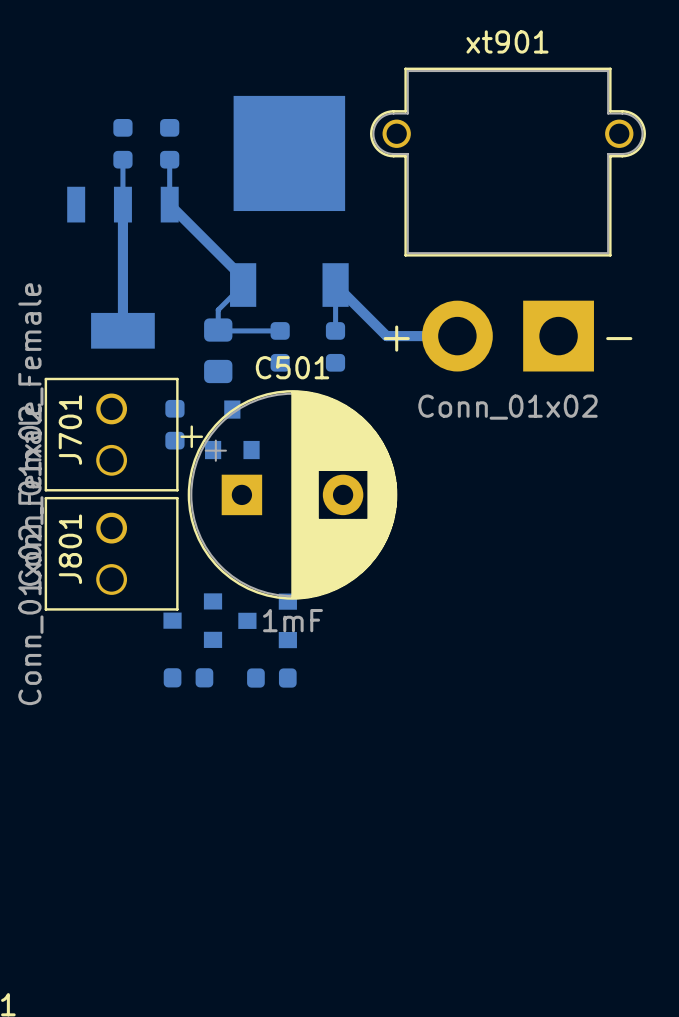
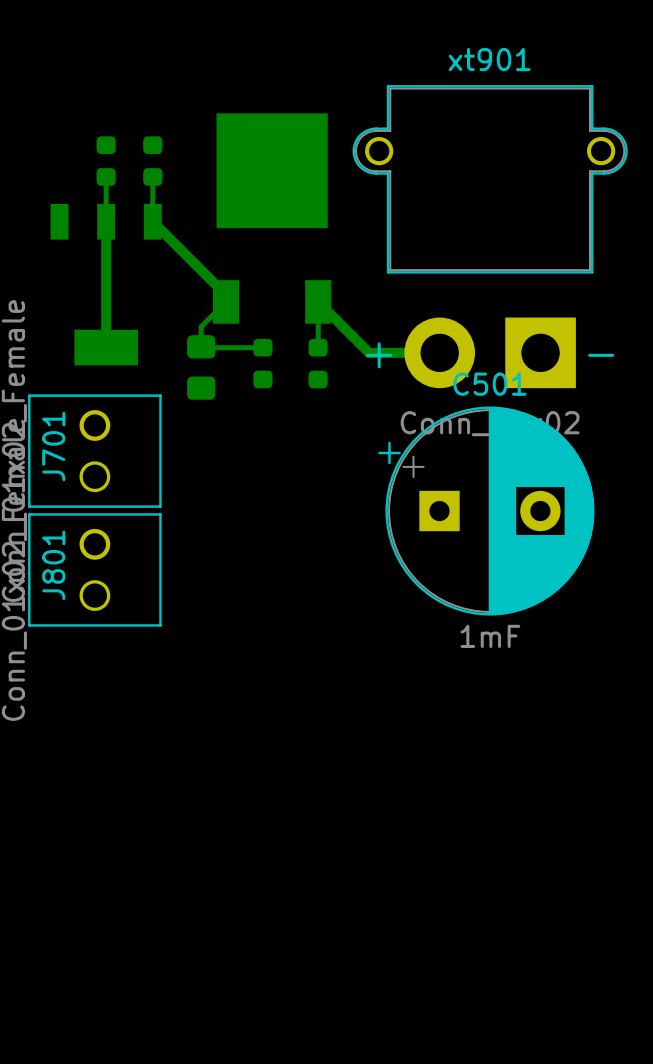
part: (174, 424) -> none
part: (232, 429) -> none
C501 position: (288, 494) -> (486, 511)
part: (192, 620) -> none
part: (267, 620) -> none
part: (188, 677) -> none
part: (271, 678) -> none

